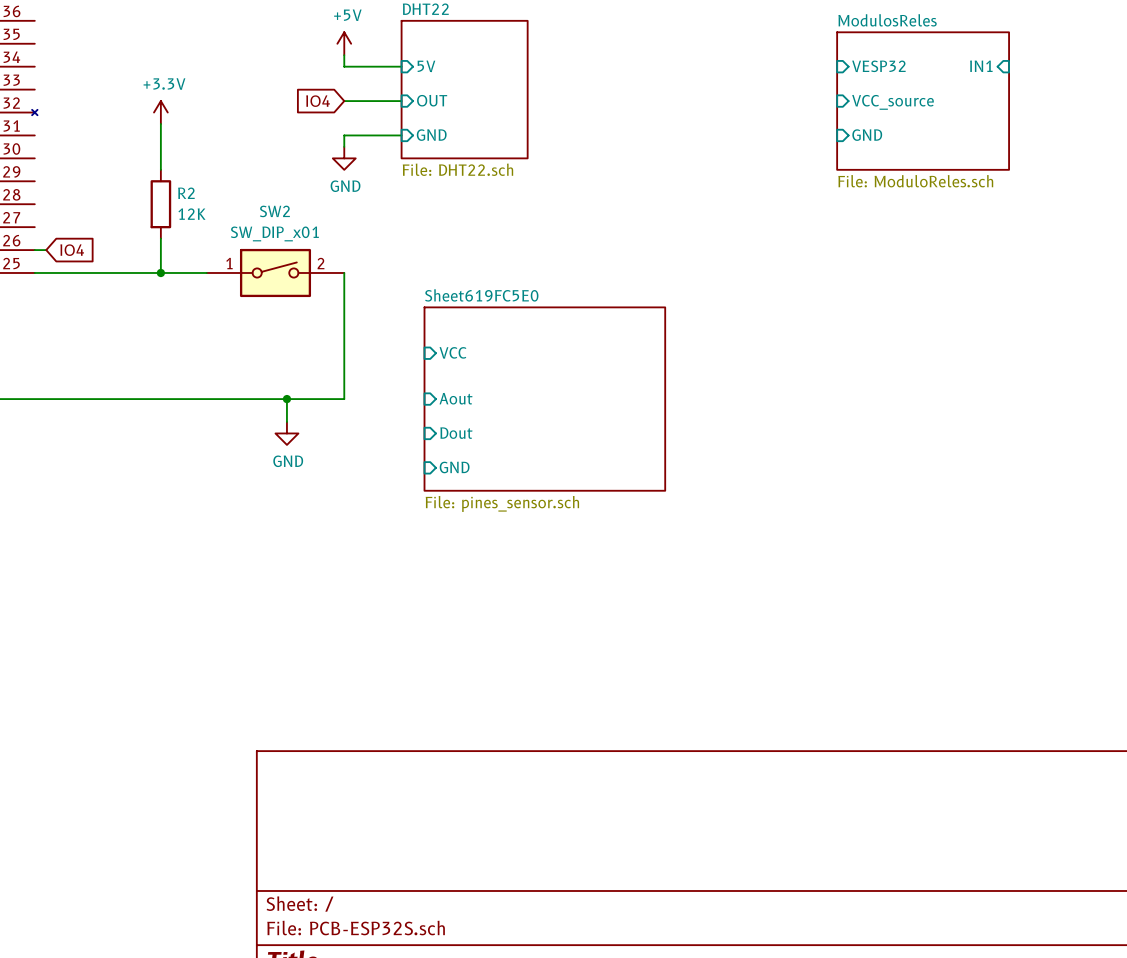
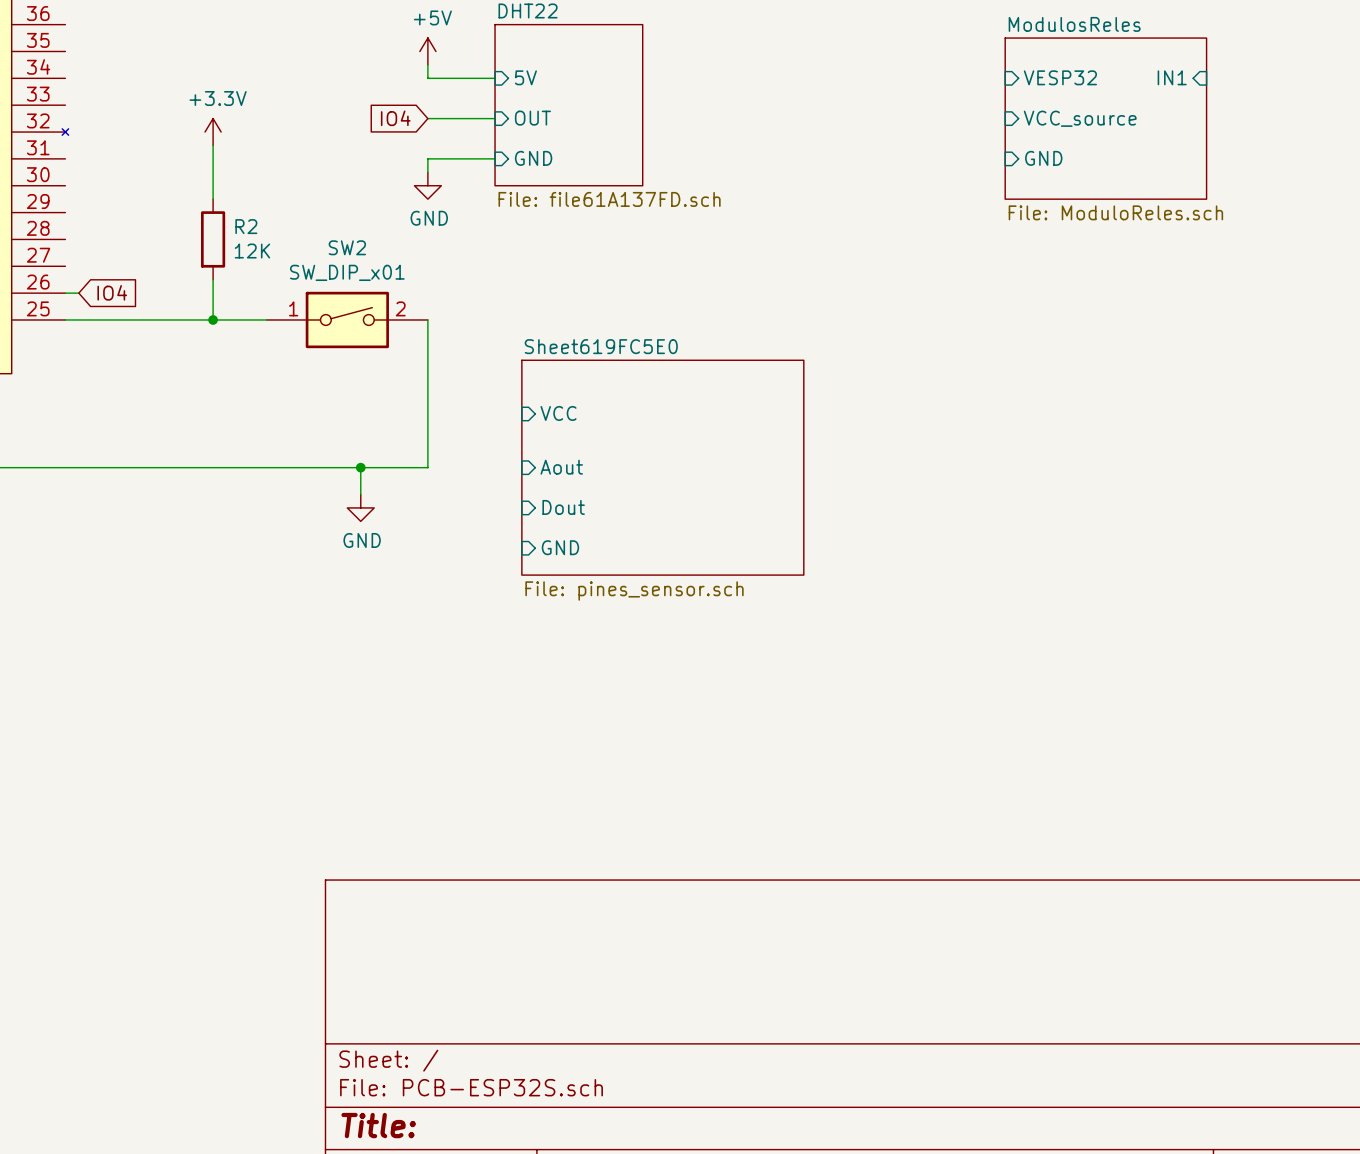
sheet DHT22 value: File: DHT22.sch (457, 169) -> File: file61A137FD.sch (609, 199)

